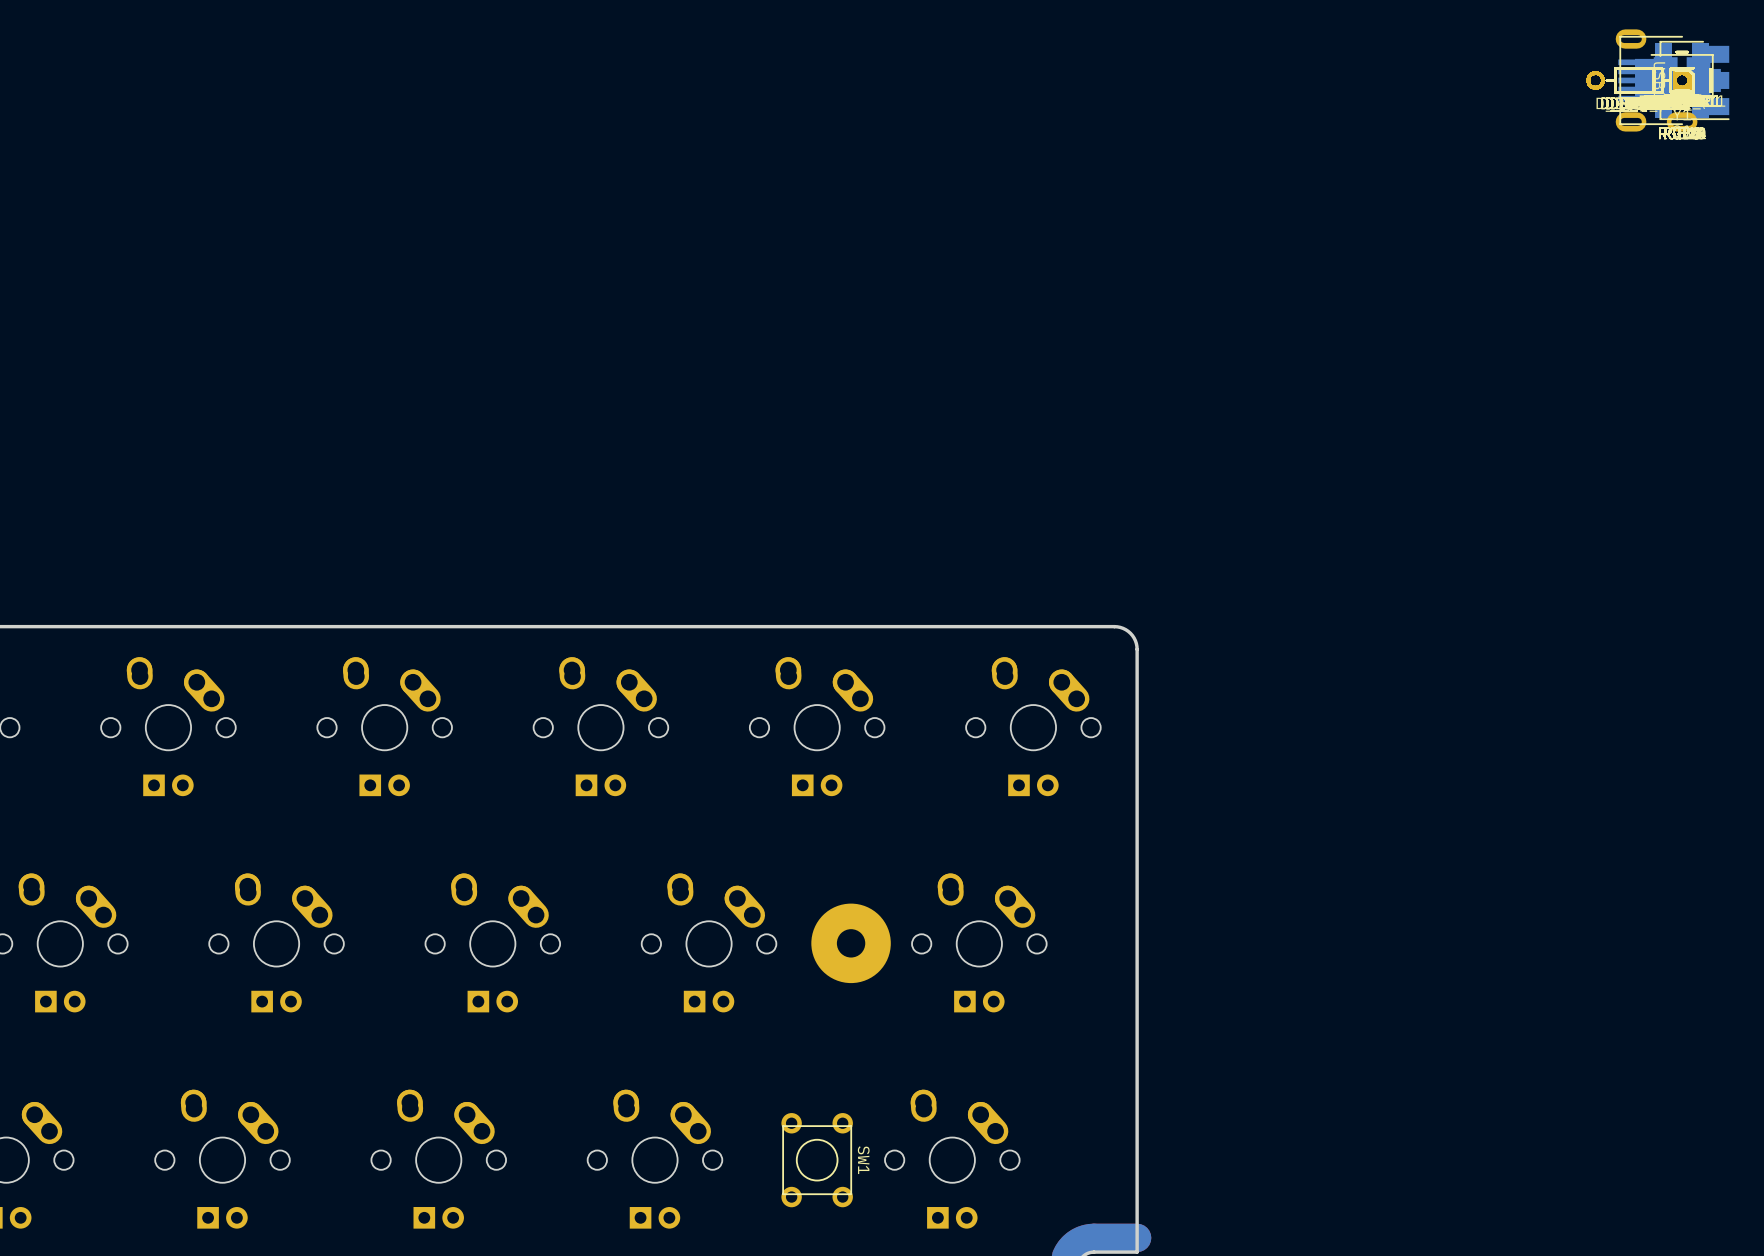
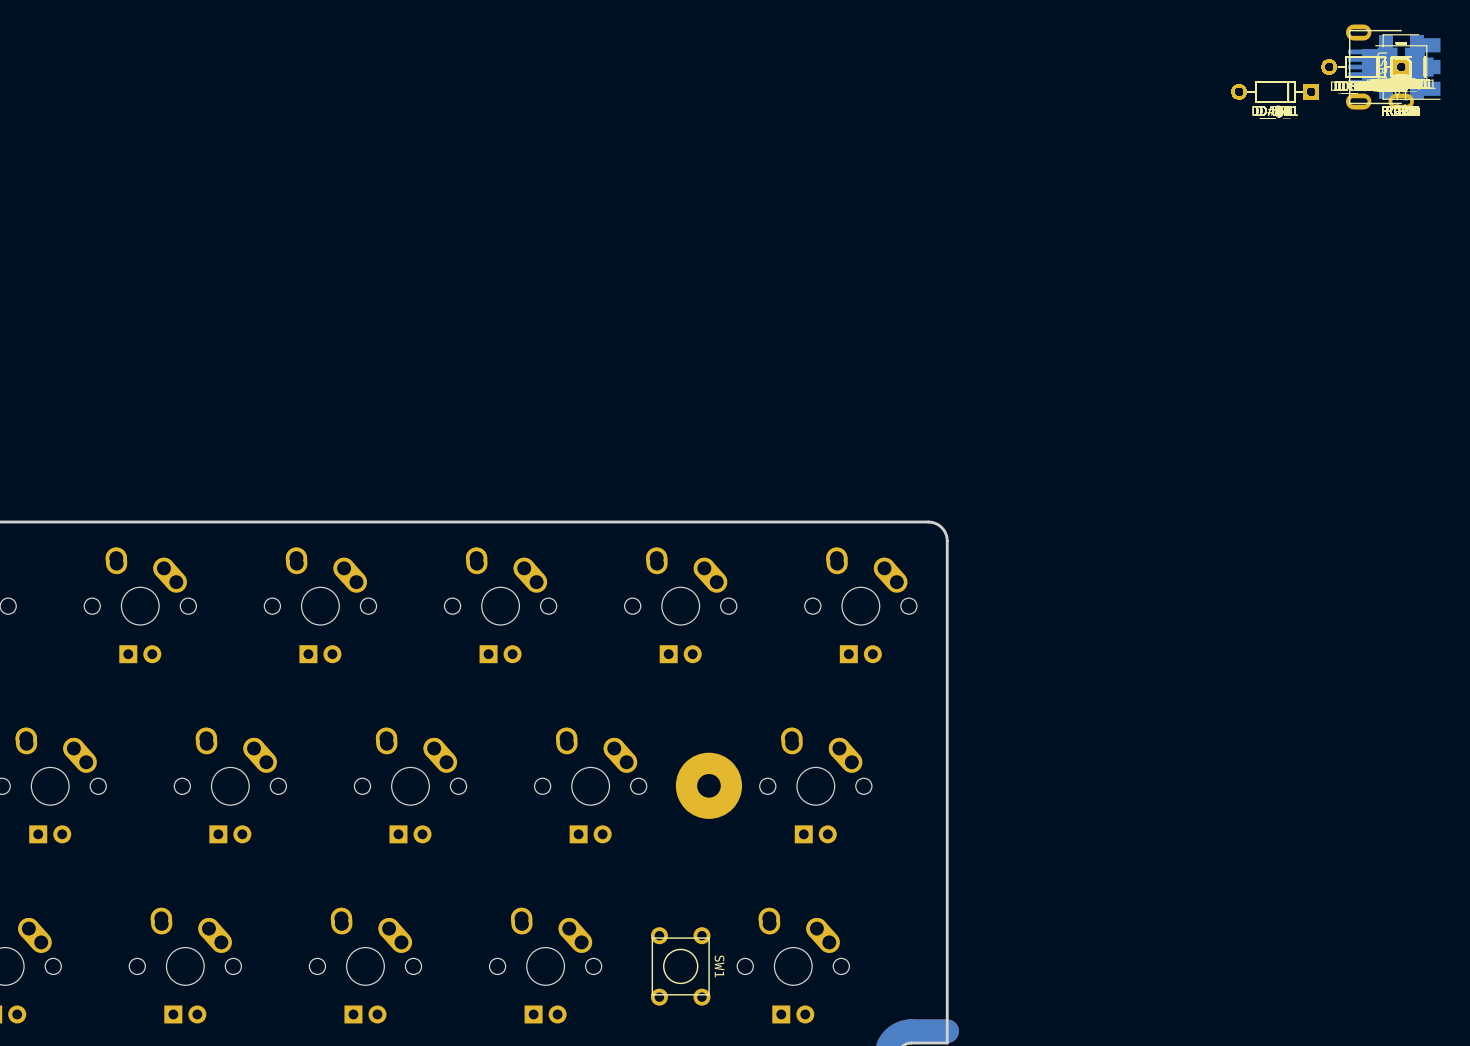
part position: (1638, 80) -> (1275, 91)
part position: (1638, 80) -> (1275, 91)
part position: (1638, 80) -> (1275, 91)
part position: (1638, 80) -> (1275, 91)
part position: (1638, 80) -> (1275, 91)
part position: (1638, 80) -> (1275, 91)
part position: (1638, 80) -> (1275, 91)
part position: (1638, 80) -> (1275, 91)
part position: (1638, 80) -> (1275, 91)
part position: (1638, 80) -> (1275, 91)
part position: (1638, 80) -> (1275, 91)
part position: (1638, 80) -> (1275, 91)
part position: (1638, 80) -> (1275, 91)
part position: (1638, 80) -> (1275, 91)
part position: (1638, 80) -> (1275, 91)
part position: (1638, 80) -> (1275, 91)
part position: (1638, 80) -> (1275, 91)
part position: (1638, 80) -> (1275, 91)
part position: (1638, 80) -> (1275, 91)
part position: (1638, 80) -> (1275, 91)
part position: (1638, 80) -> (1275, 91)
part position: (1638, 80) -> (1275, 91)
part position: (1638, 80) -> (1275, 91)
part position: (1638, 80) -> (1275, 91)
part position: (1638, 80) -> (1275, 91)
part position: (1638, 80) -> (1275, 91)
part position: (1638, 80) -> (1275, 91)
part position: (1638, 80) -> (1275, 91)
part position: (1638, 80) -> (1275, 91)
part position: (1638, 80) -> (1275, 91)
part position: (1638, 80) -> (1275, 91)
part position: (1638, 80) -> (1275, 91)
part position: (1638, 80) -> (1275, 91)
part position: (1638, 80) -> (1275, 91)
part position: (1638, 80) -> (1275, 91)
part position: (1638, 80) -> (1275, 91)
part position: (1638, 80) -> (1275, 91)
part position: (1638, 80) -> (1275, 91)
part position: (1638, 80) -> (1275, 91)
part position: (1638, 80) -> (1275, 91)
part position: (1638, 80) -> (1275, 91)
part position: (1638, 80) -> (1275, 91)
part position: (1638, 80) -> (1275, 91)
part position: (1638, 80) -> (1275, 91)
part position: (1638, 80) -> (1275, 91)
part position: (1638, 80) -> (1275, 91)
part position: (1638, 80) -> (1275, 91)
part position: (1638, 80) -> (1275, 91)
part position: (1638, 80) -> (1275, 91)
part position: (1638, 80) -> (1275, 91)

